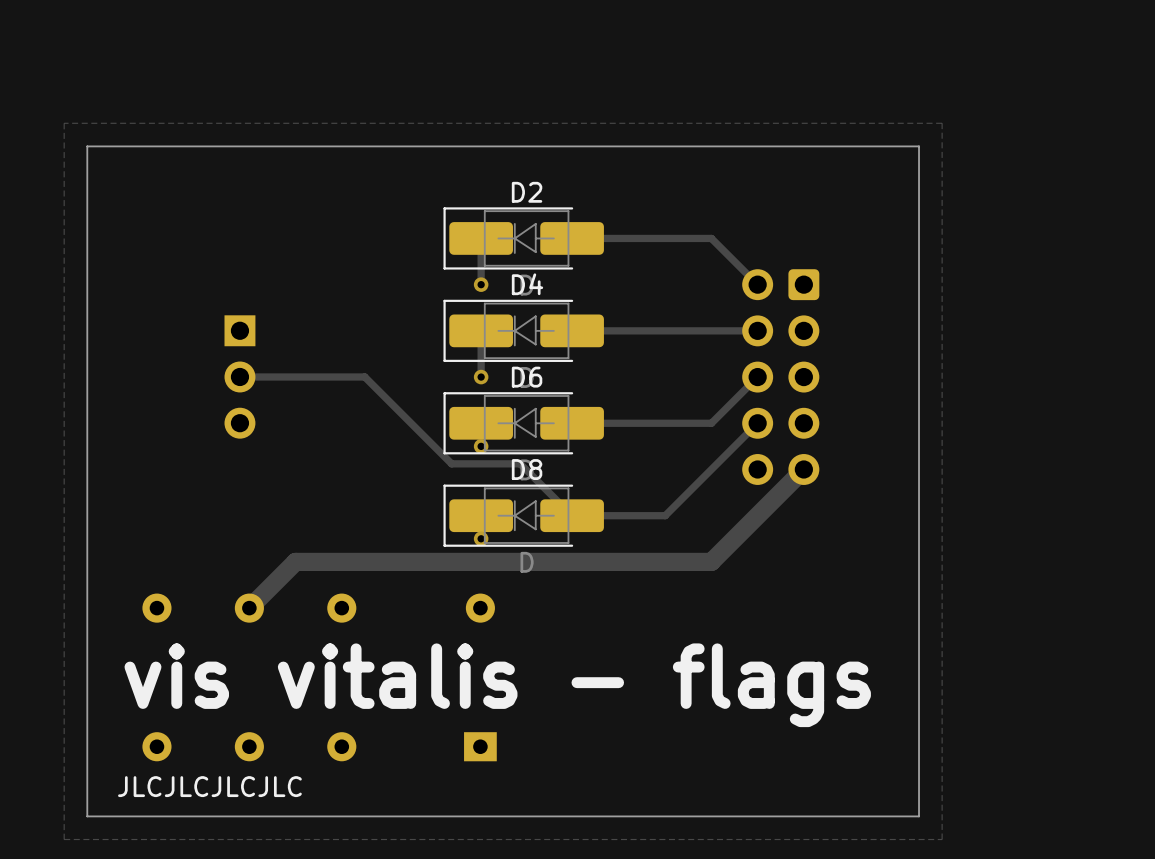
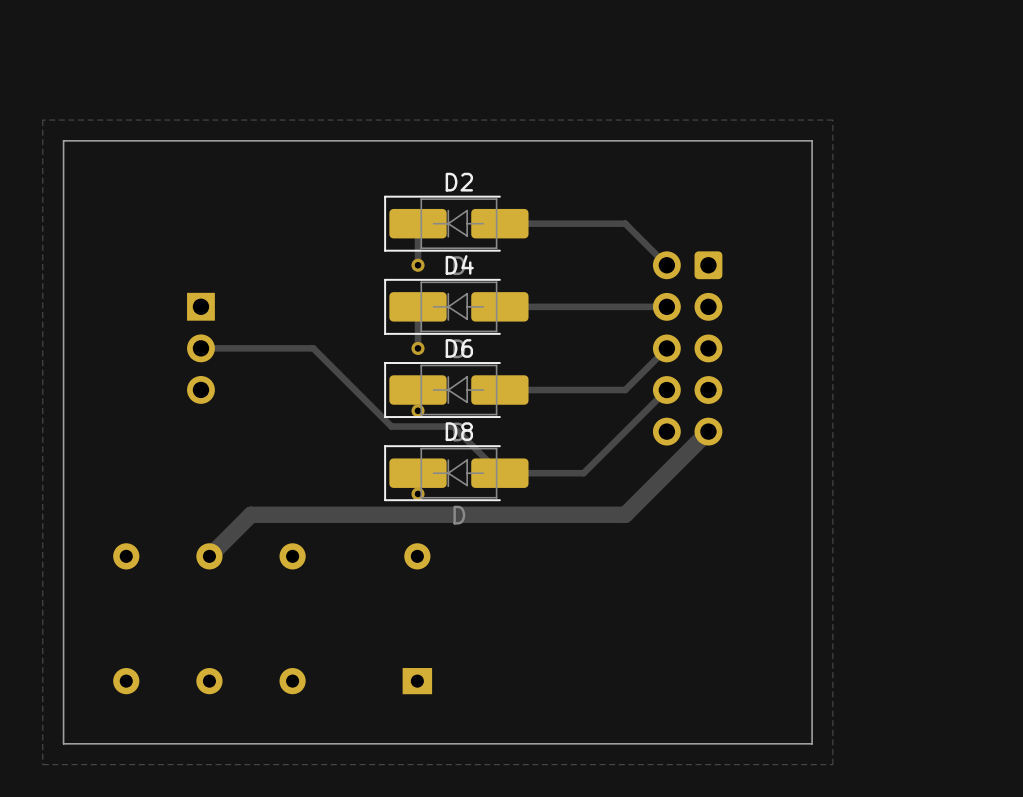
text: vis vitalis - flags (497, 685) -> none
text: JLCJLCJLCJLC (209, 786) -> none

